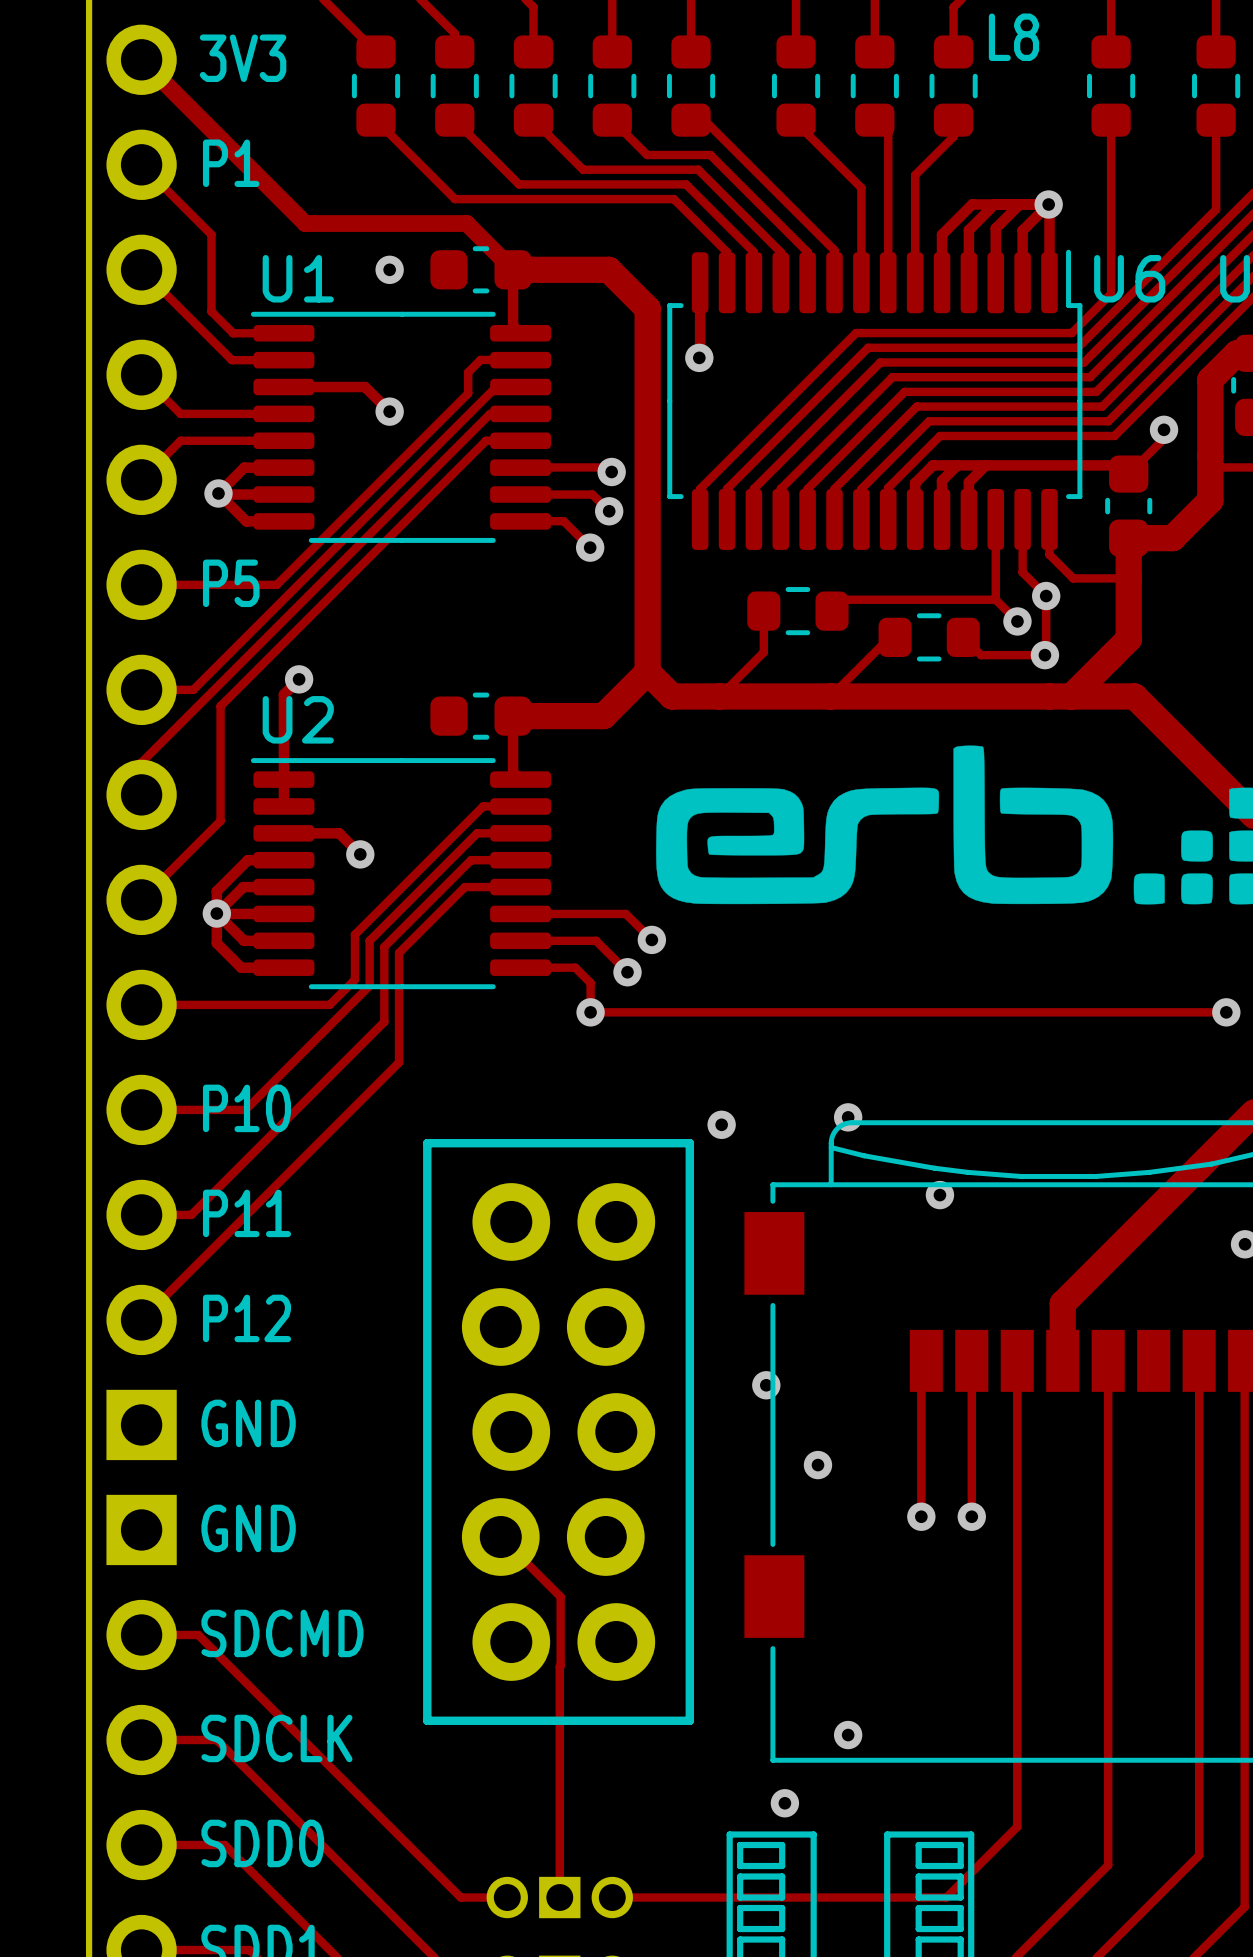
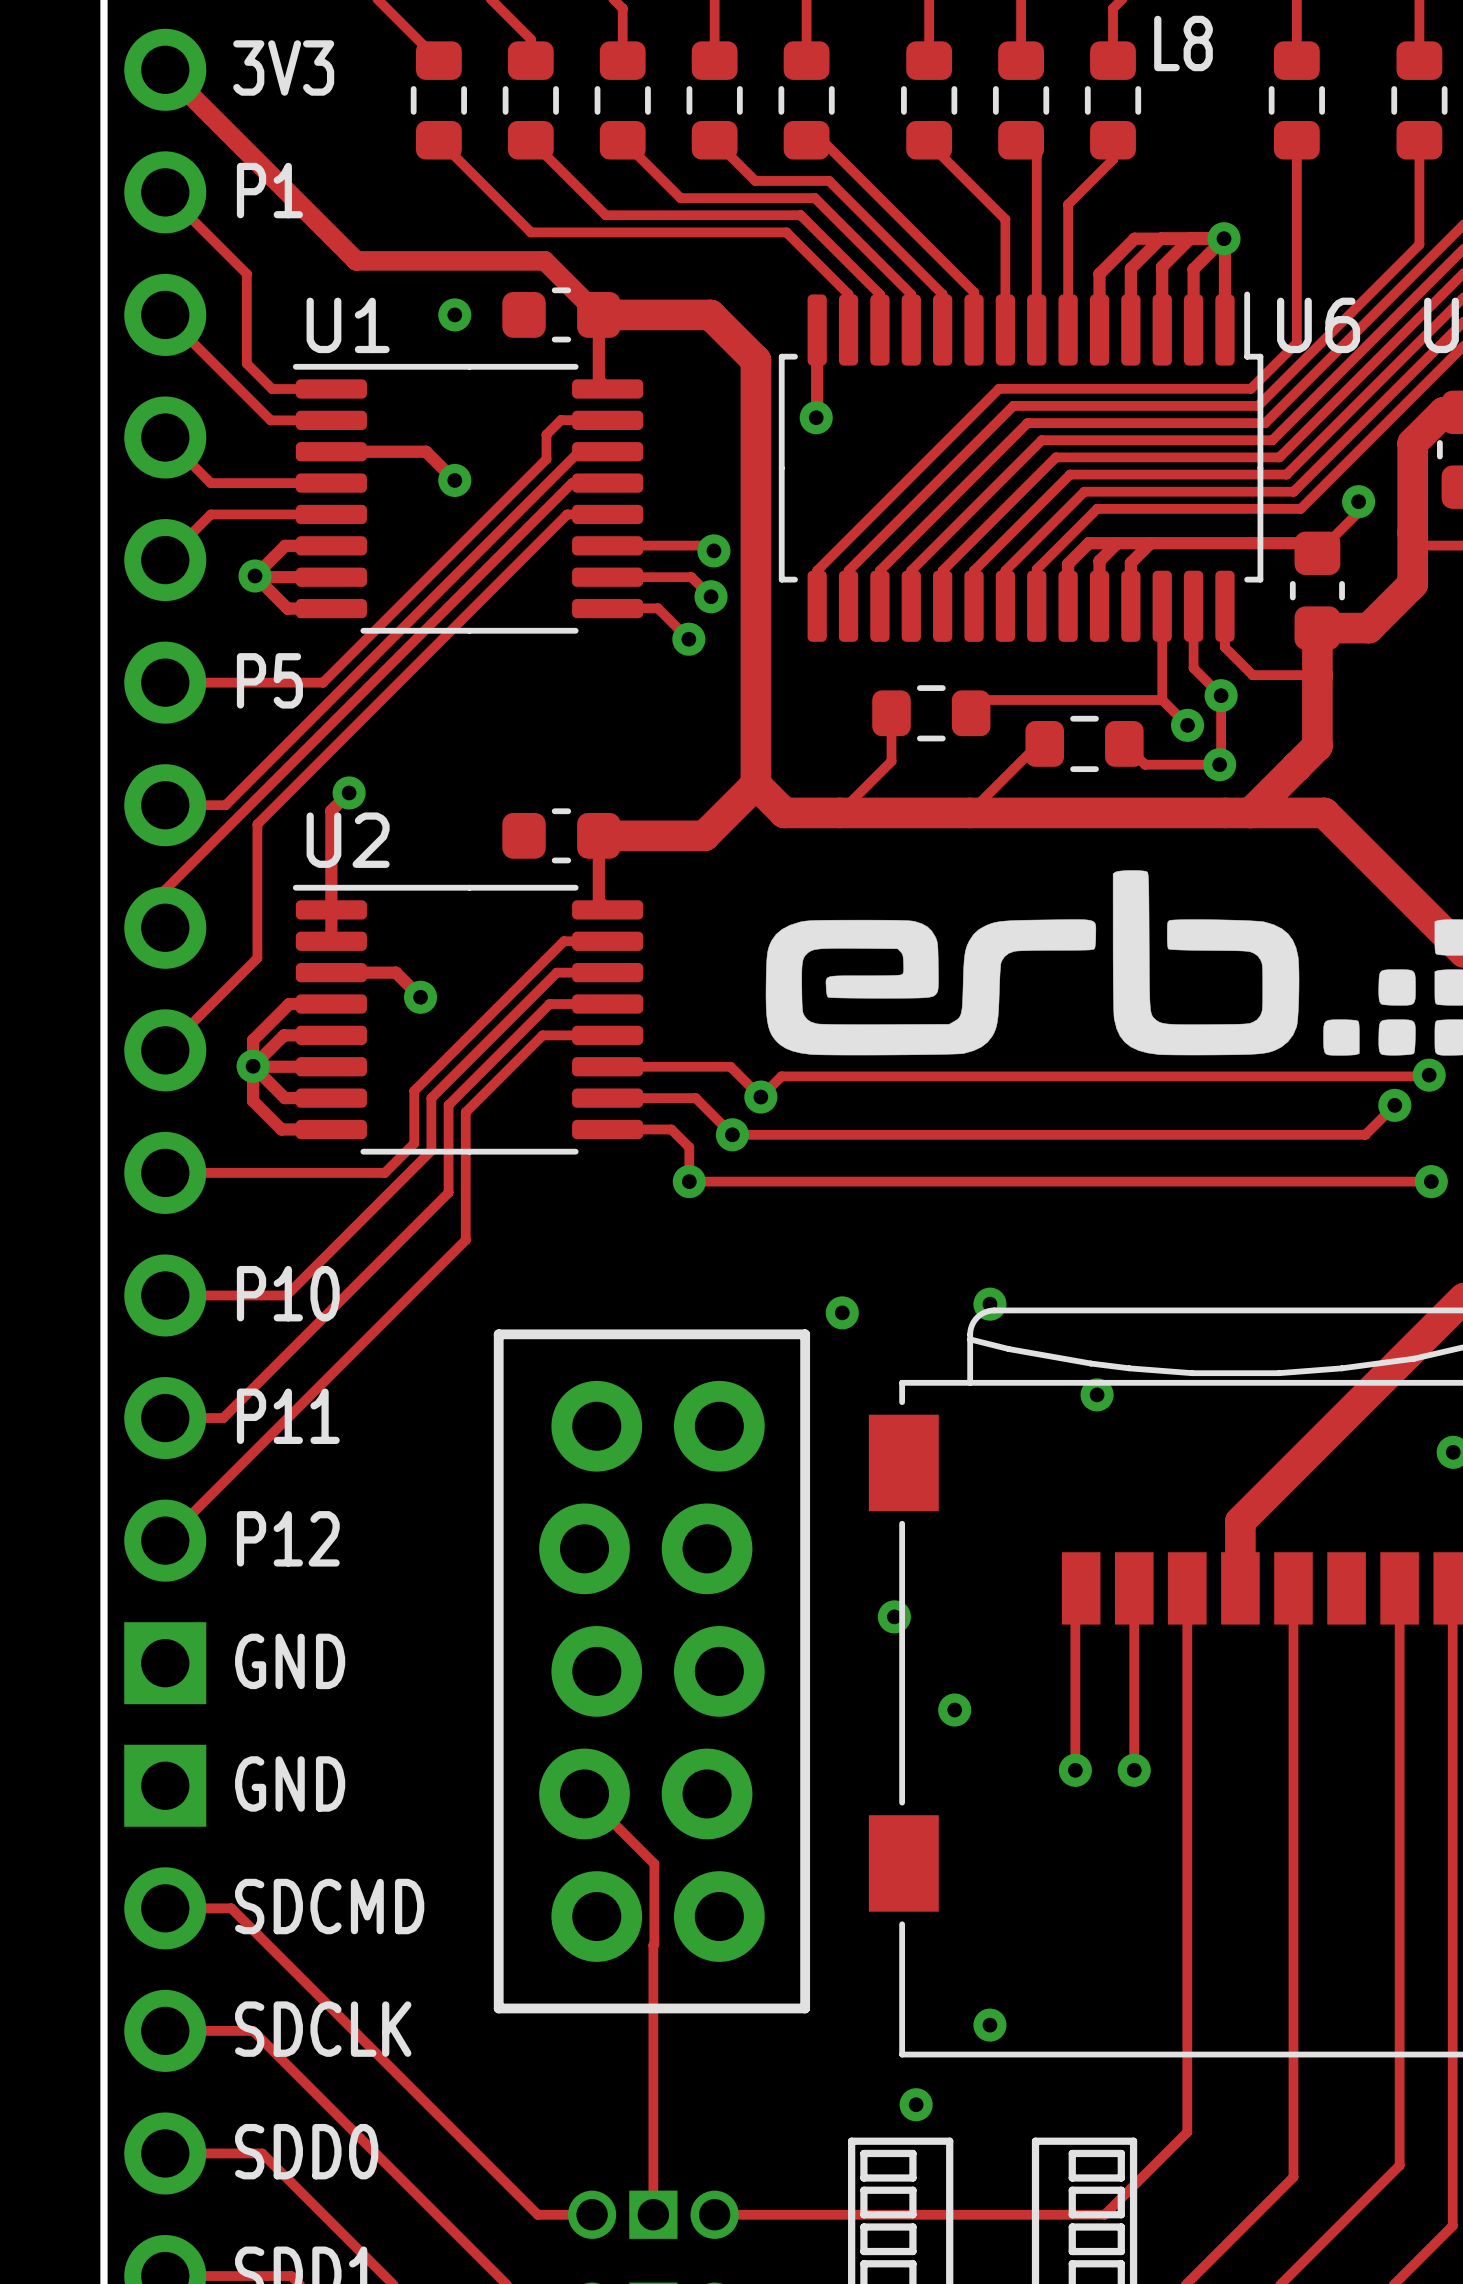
track: none -> (1429, 1075) (781, 1076) (760, 1097)
via: none -> (1429, 1075)
track: none -> (1394, 1105) (1365, 1134) (732, 1134)
via: none -> (1394, 1105)

